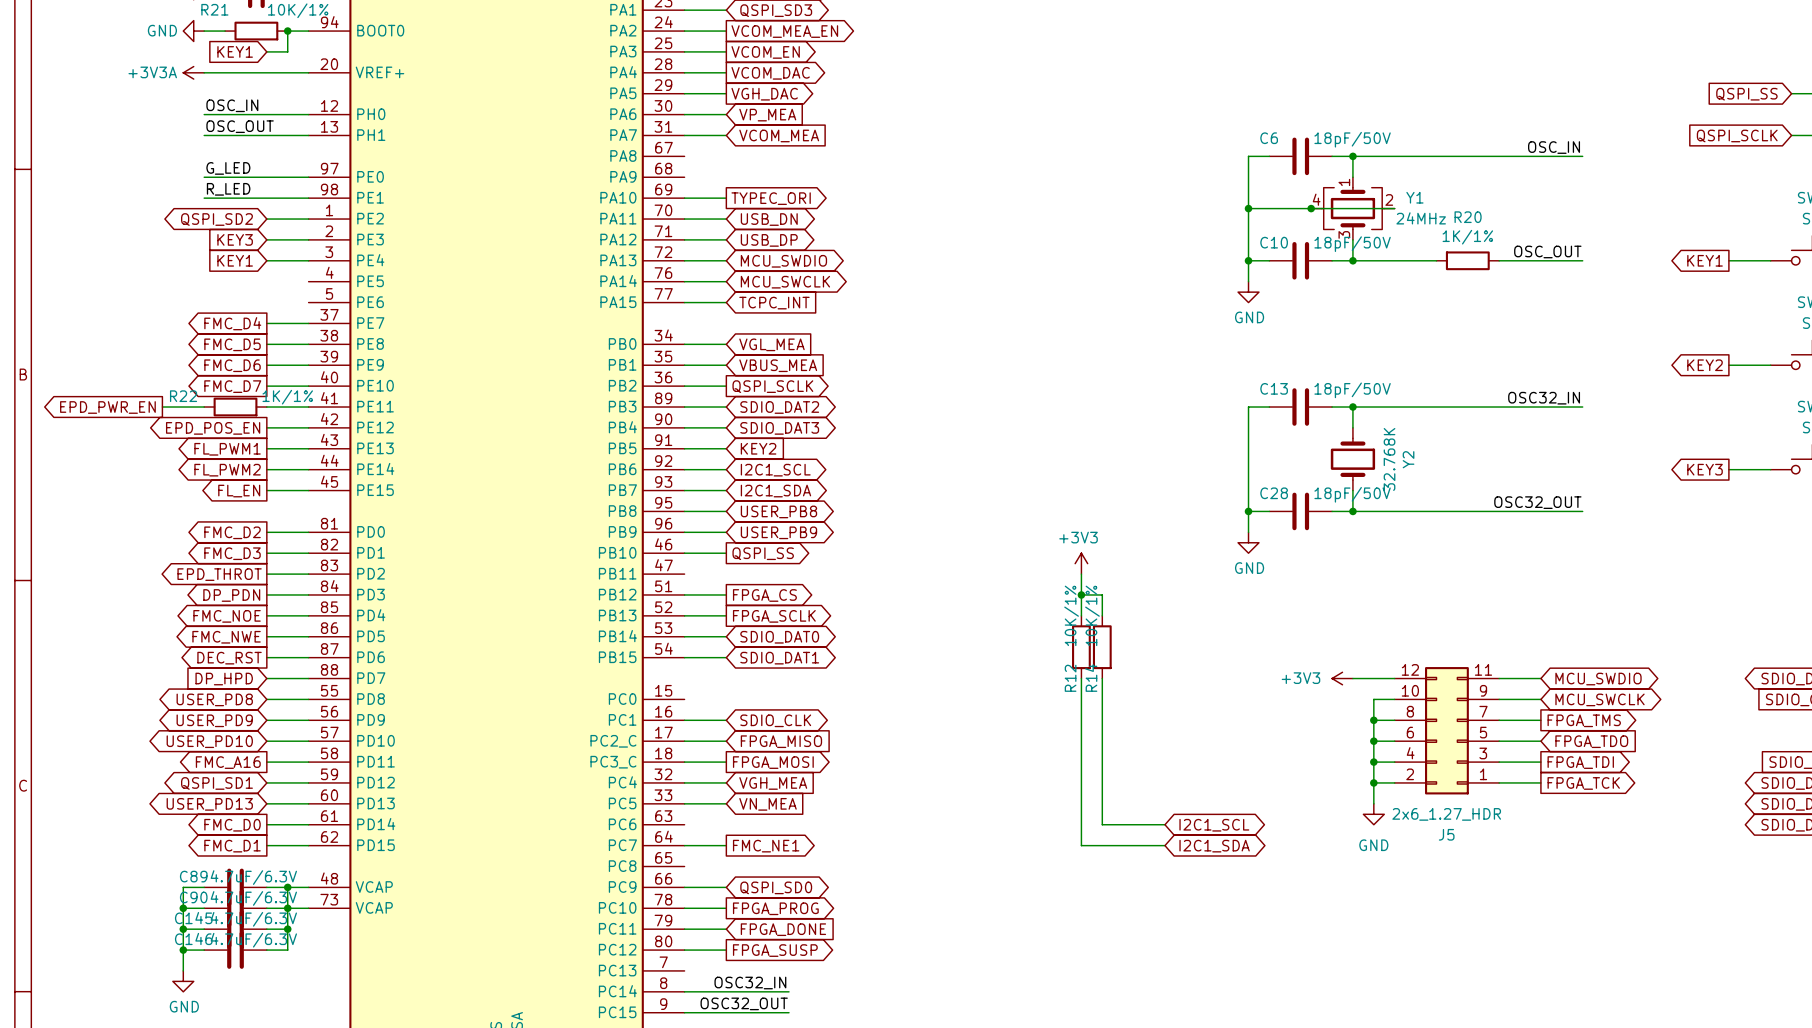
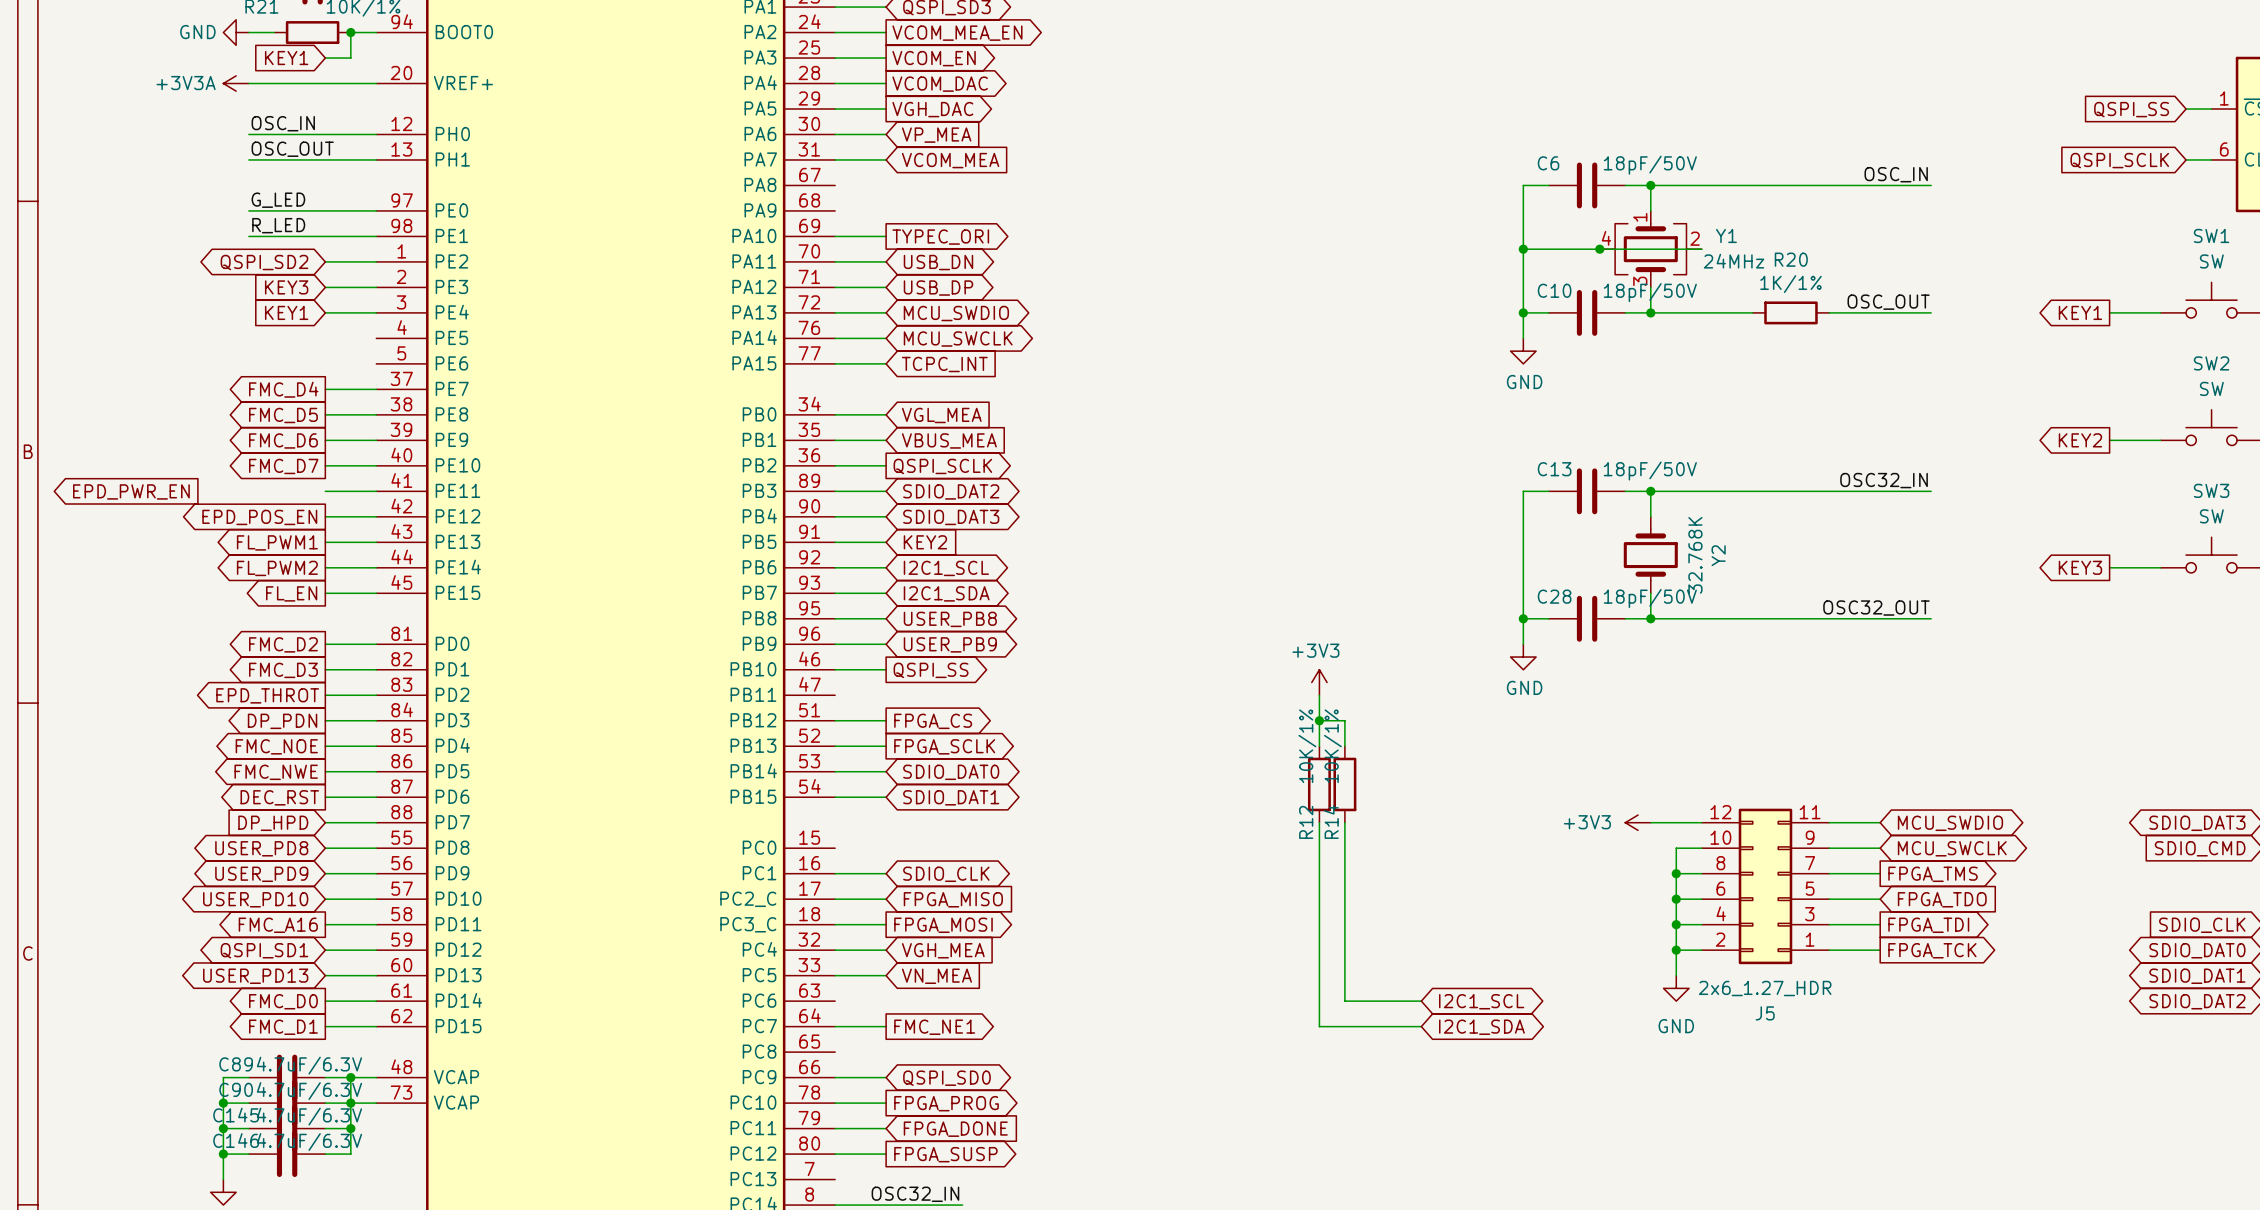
wire: (162, 407) (204, 407) -> none
R22: 1K/1% (235, 407) -> none

